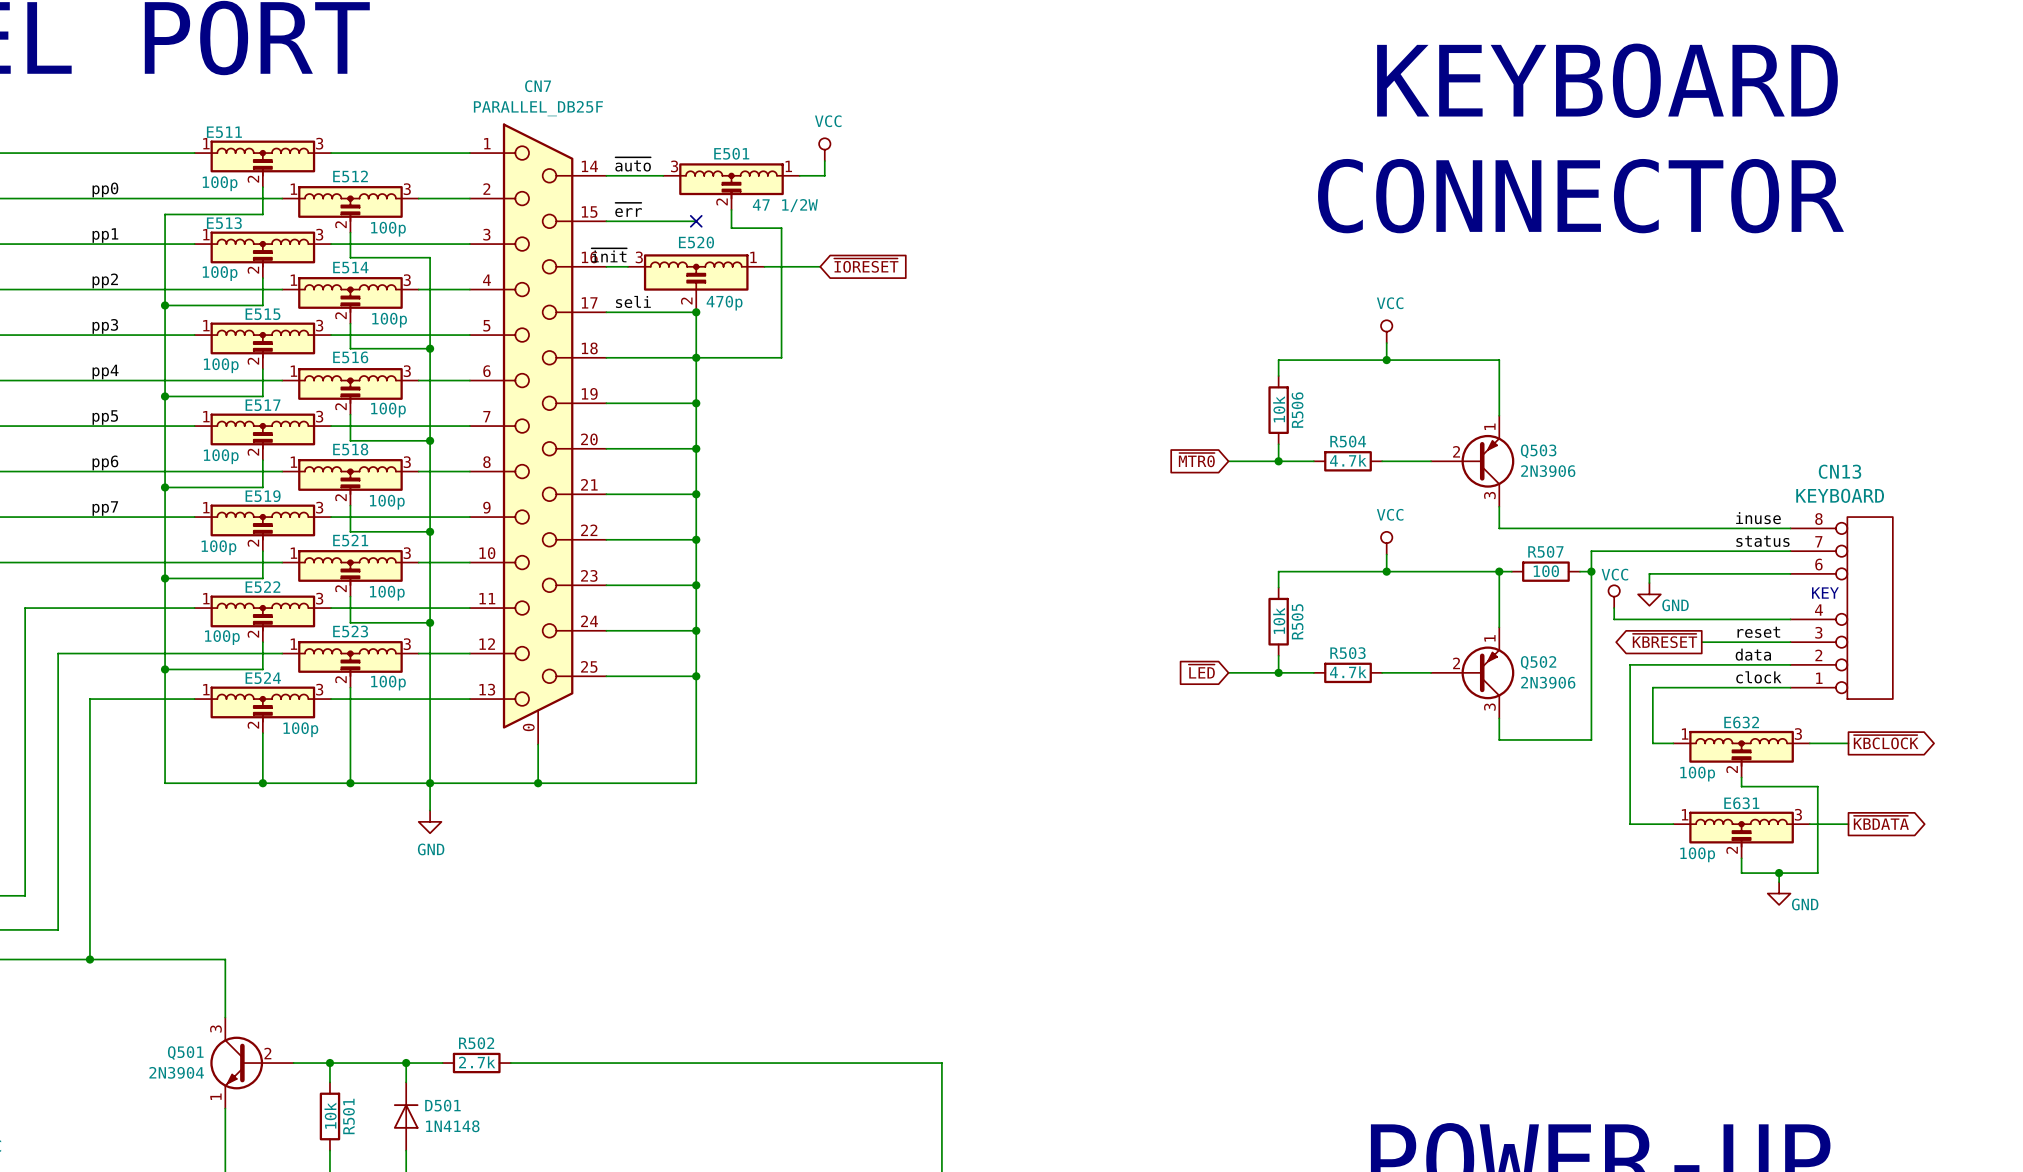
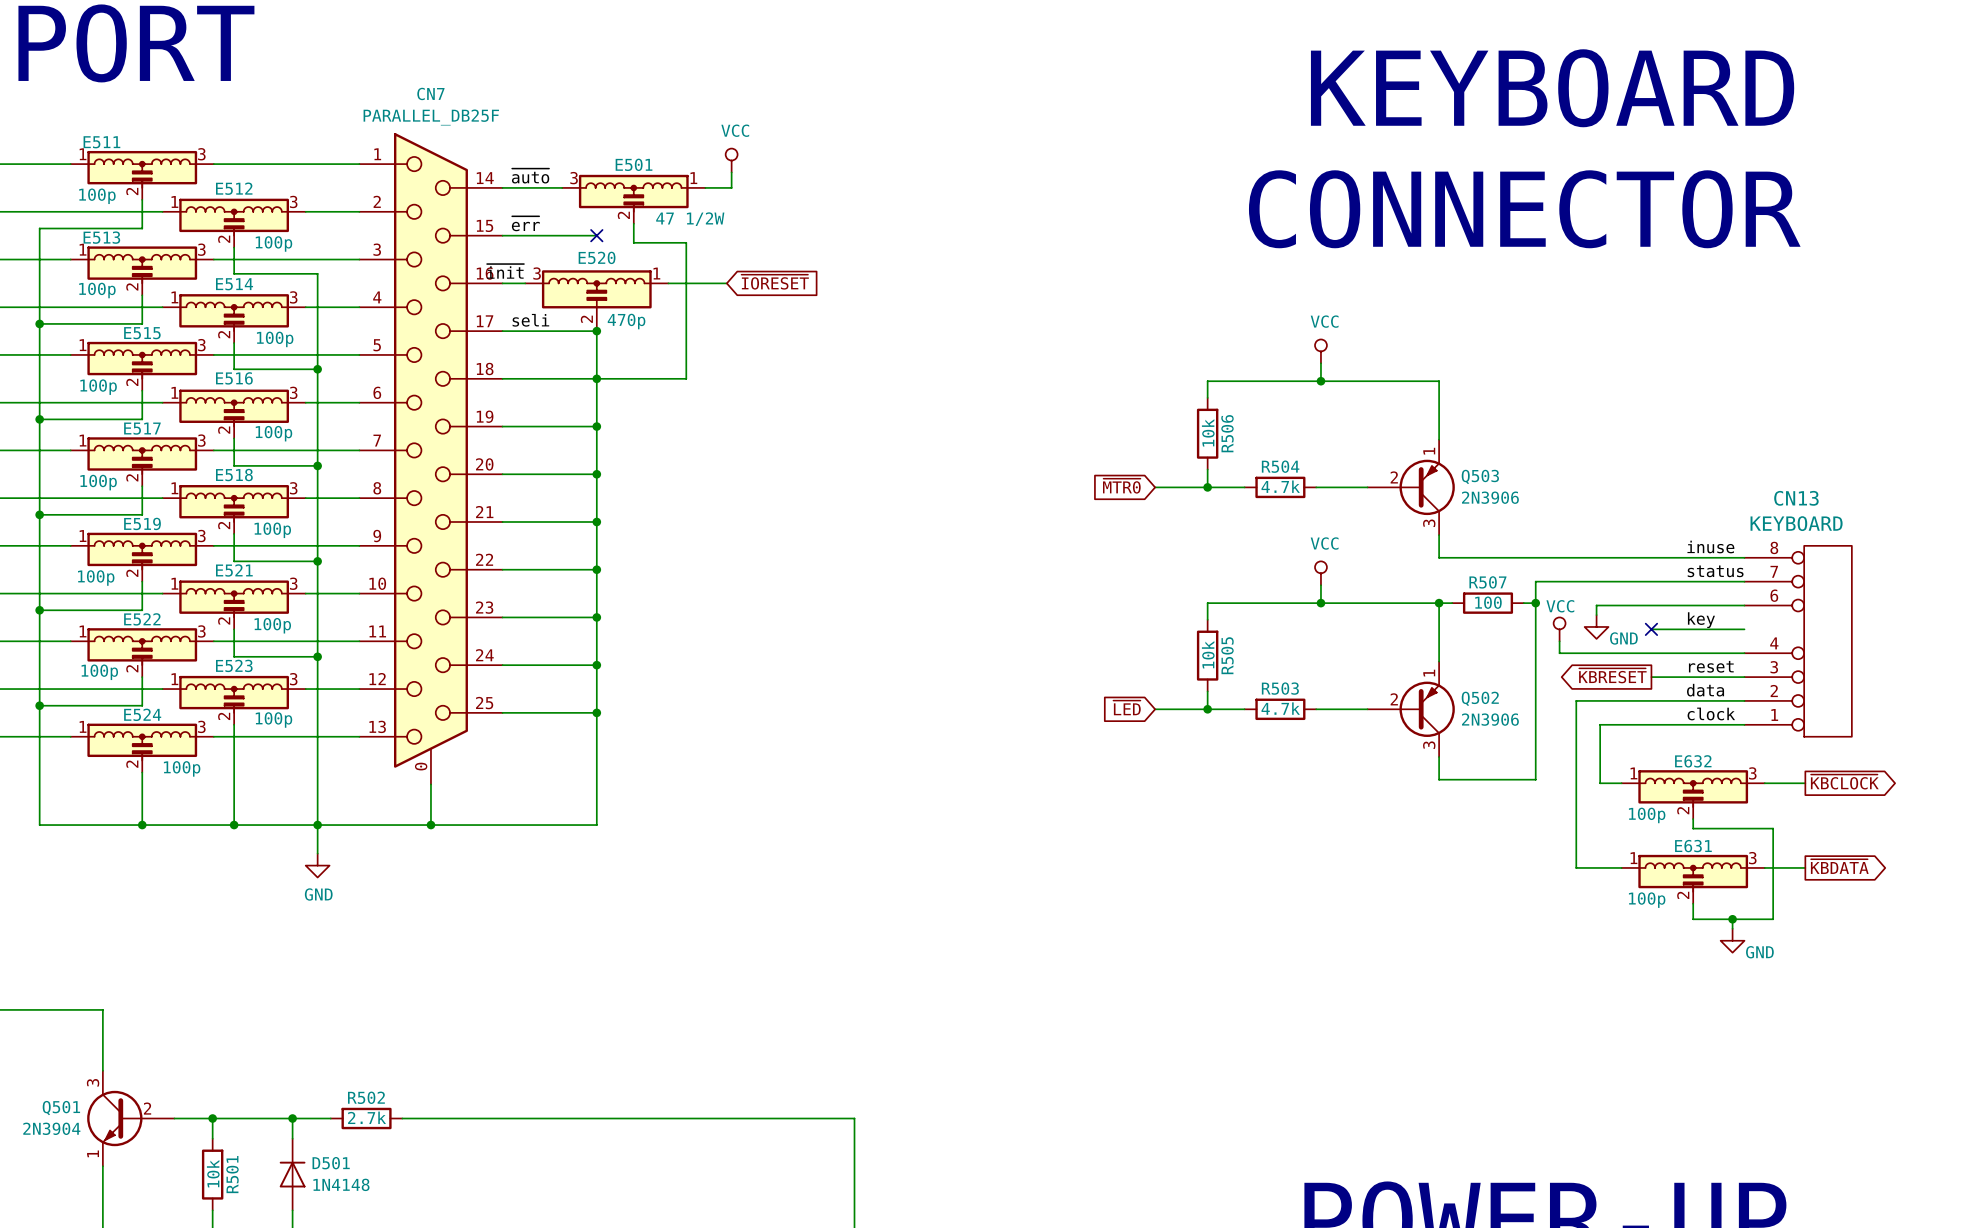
label: none -> key (1701, 620)
text: KEY (1825, 593) -> none
wire: none -> (1651, 629) (1744, 629)
no-connect mark: none -> (1651, 629)

